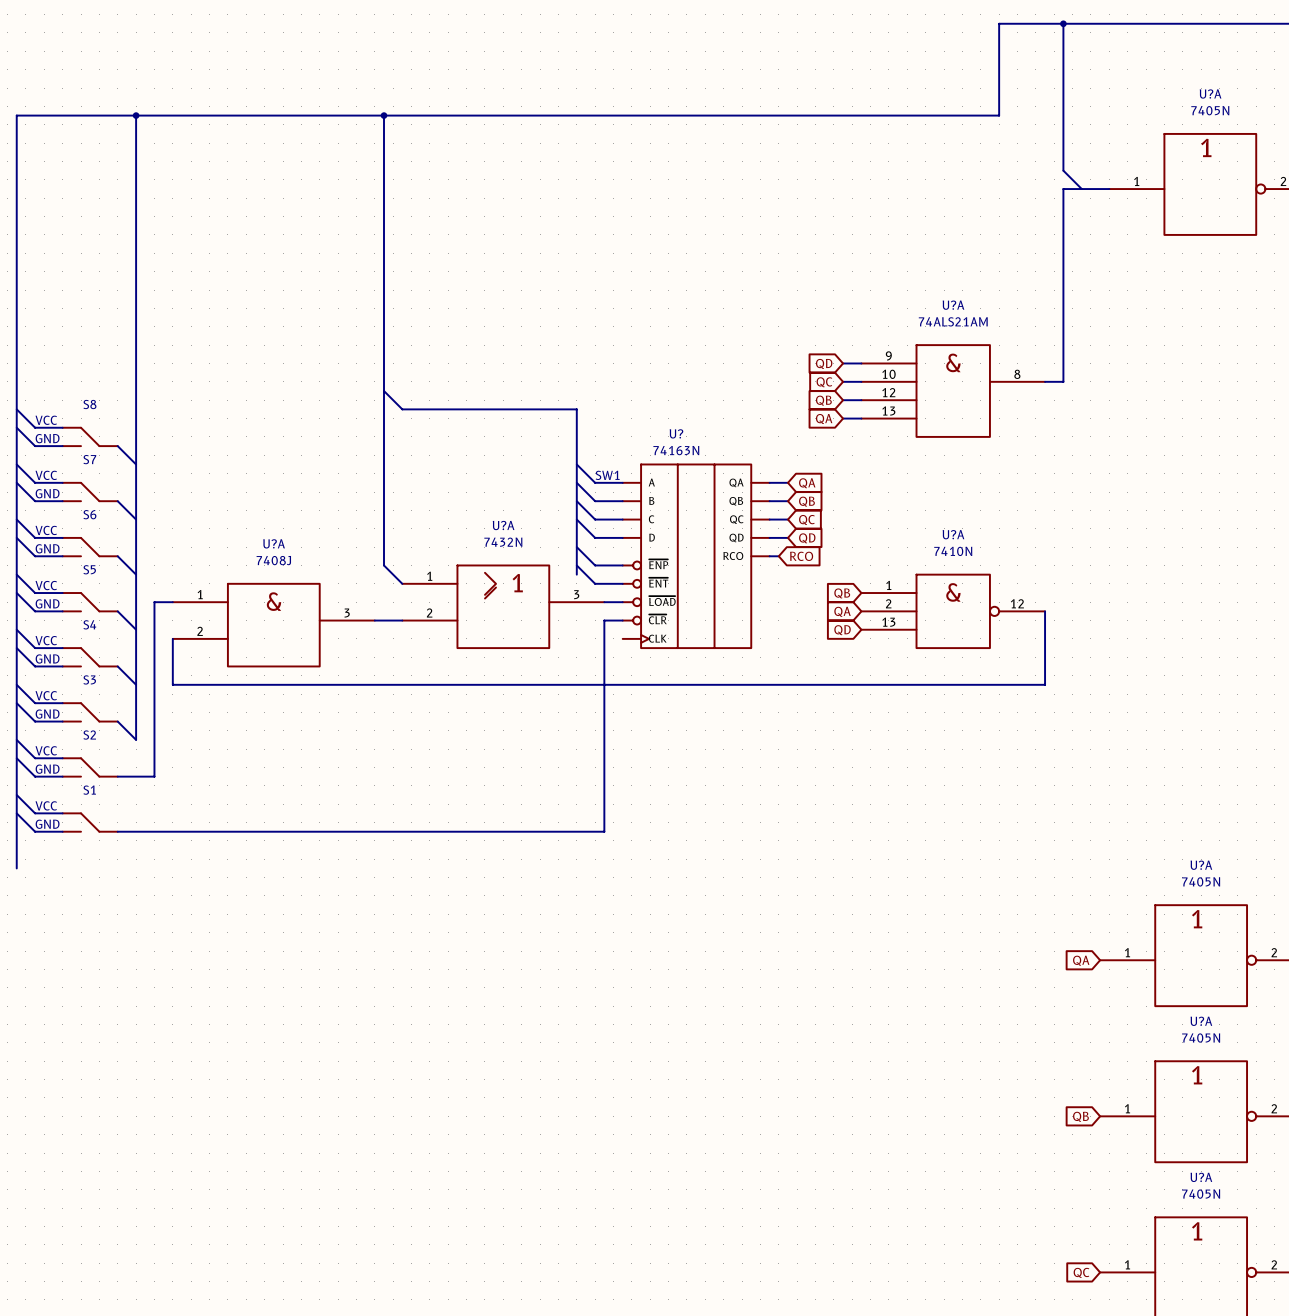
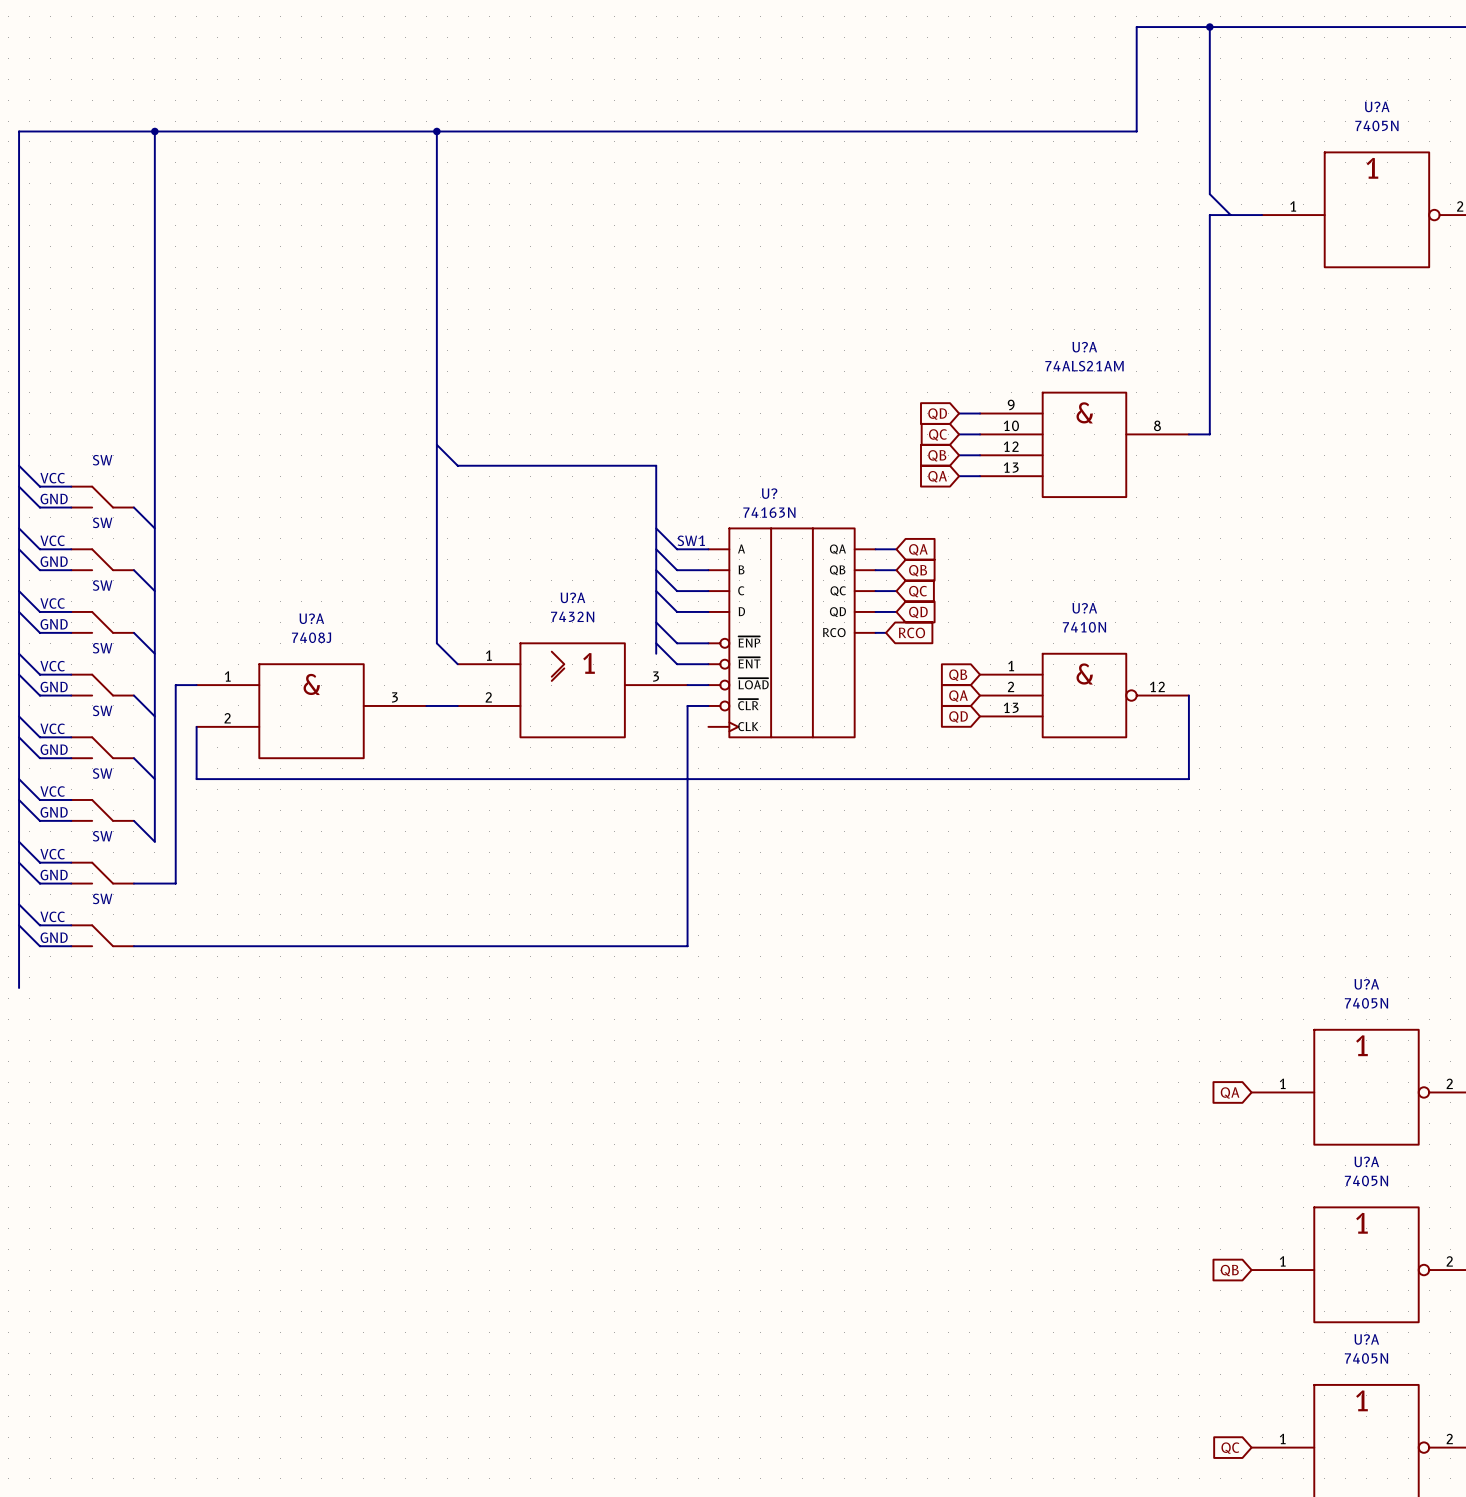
part value: S8 (89, 404) -> SW (102, 460)
part value: S7 (89, 459) -> SW (102, 522)
part value: S6 (89, 514) -> SW (102, 585)
part value: S5 (89, 569) -> SW (102, 648)
part value: S4 (89, 624) -> SW (102, 710)
part value: S3 (89, 679) -> SW (102, 773)
part value: S2 (89, 735) -> SW (102, 836)
part value: S1 (89, 790) -> SW (102, 898)

